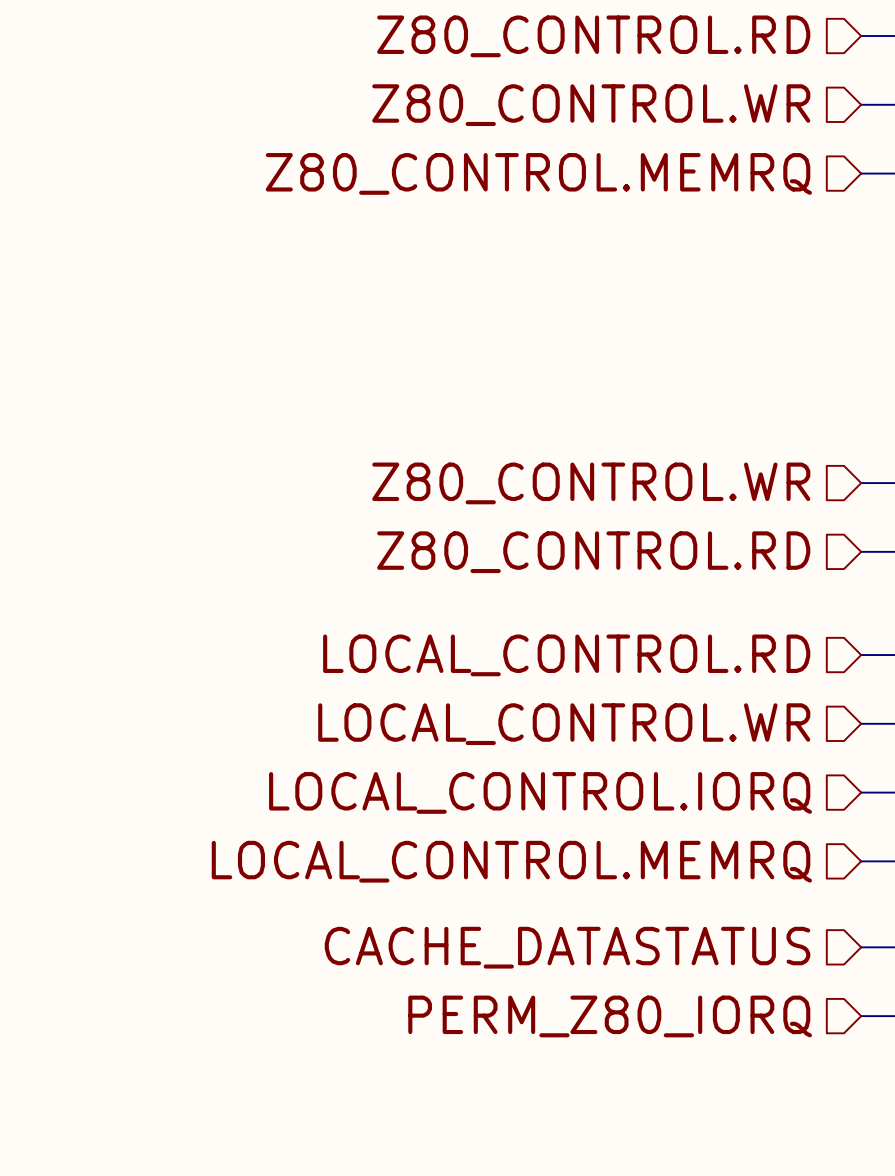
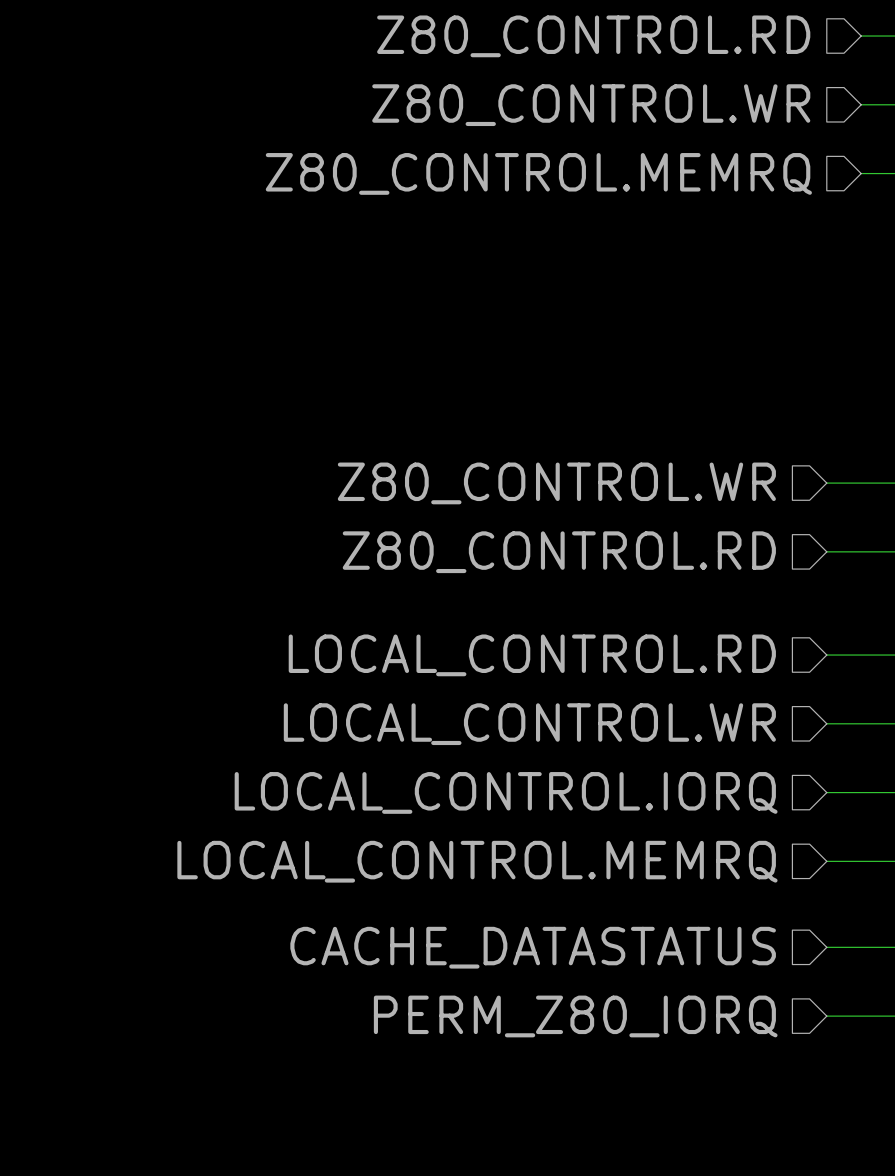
hierarchical label position: Z80_CONTROL.WR (591, 483) -> Z80_CONTROL.WR (556, 483)
wire: none -> (826, 483) (861, 483)
wire: none -> (826, 551) (861, 551)
hierarchical label position: Z80_CONTROL.RD (593, 552) -> Z80_CONTROL.RD (559, 552)
hierarchical label position: LOCAL_CONTROL.RD (566, 655) -> LOCAL_CONTROL.RD (532, 655)
wire: none -> (826, 655) (861, 655)
wire: none -> (826, 723) (861, 723)
hierarchical label position: LOCAL_CONTROL.WR (564, 724) -> LOCAL_CONTROL.WR (529, 724)
hierarchical label position: LOCAL_CONTROL.IORQ (540, 792) -> LOCAL_CONTROL.IORQ (506, 792)
wire: none -> (826, 792) (861, 792)
hierarchical label position: LOCAL_CONTROL.MEMRQ (511, 861) -> LOCAL_CONTROL.MEMRQ (477, 861)
wire: none -> (826, 861) (861, 861)
hierarchical label position: CACHE_DATASTATUS (567, 947) -> CACHE_DATASTATUS (533, 947)
wire: none -> (826, 947) (861, 947)
hierarchical label position: PERM_Z80_IORQ (610, 1016) -> PERM_Z80_IORQ (575, 1016)
wire: none -> (826, 1016) (861, 1016)

